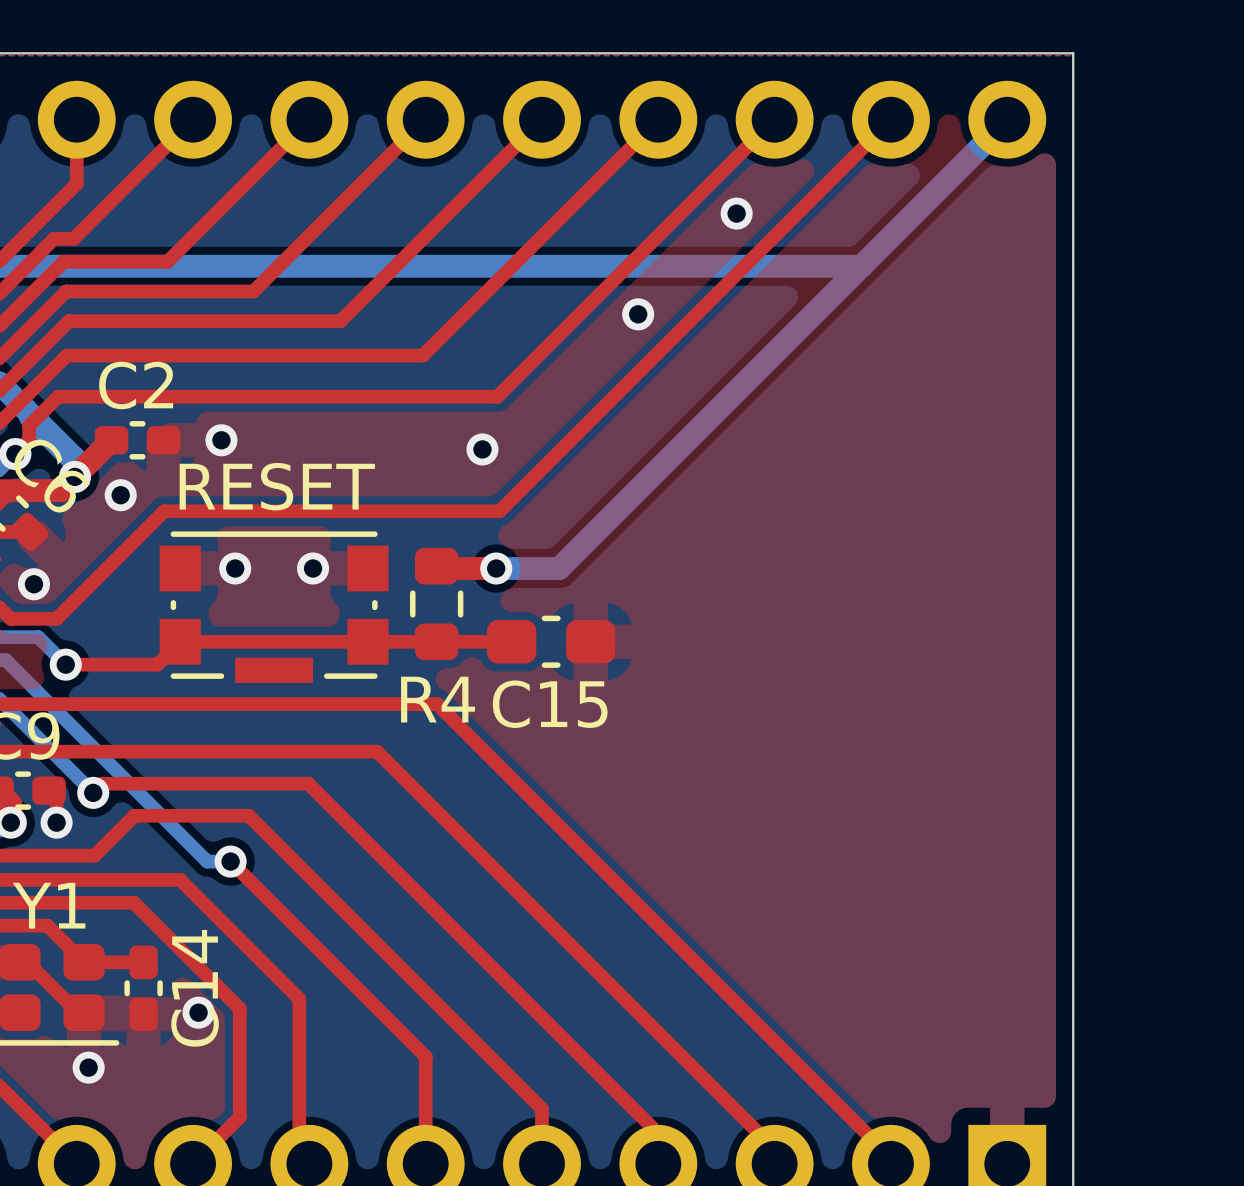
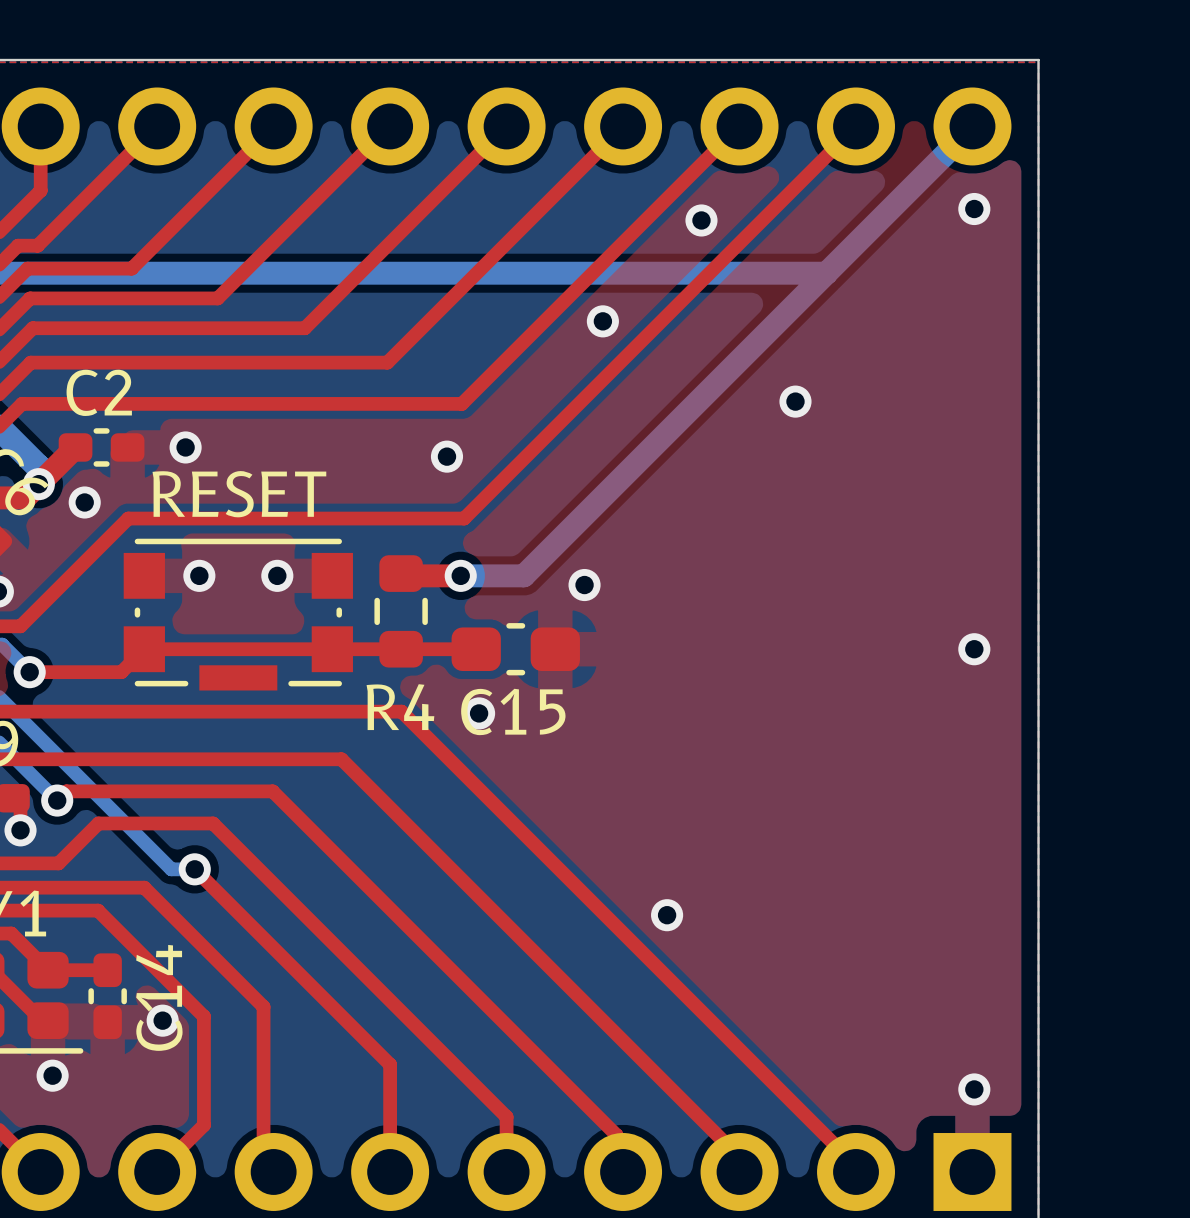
via: none -> (974, 209)
via: none -> (795, 401)
via: none -> (584, 585)
via: none -> (974, 649)
via: none -> (479, 713)
via: none -> (667, 915)
via: none -> (974, 1089)

